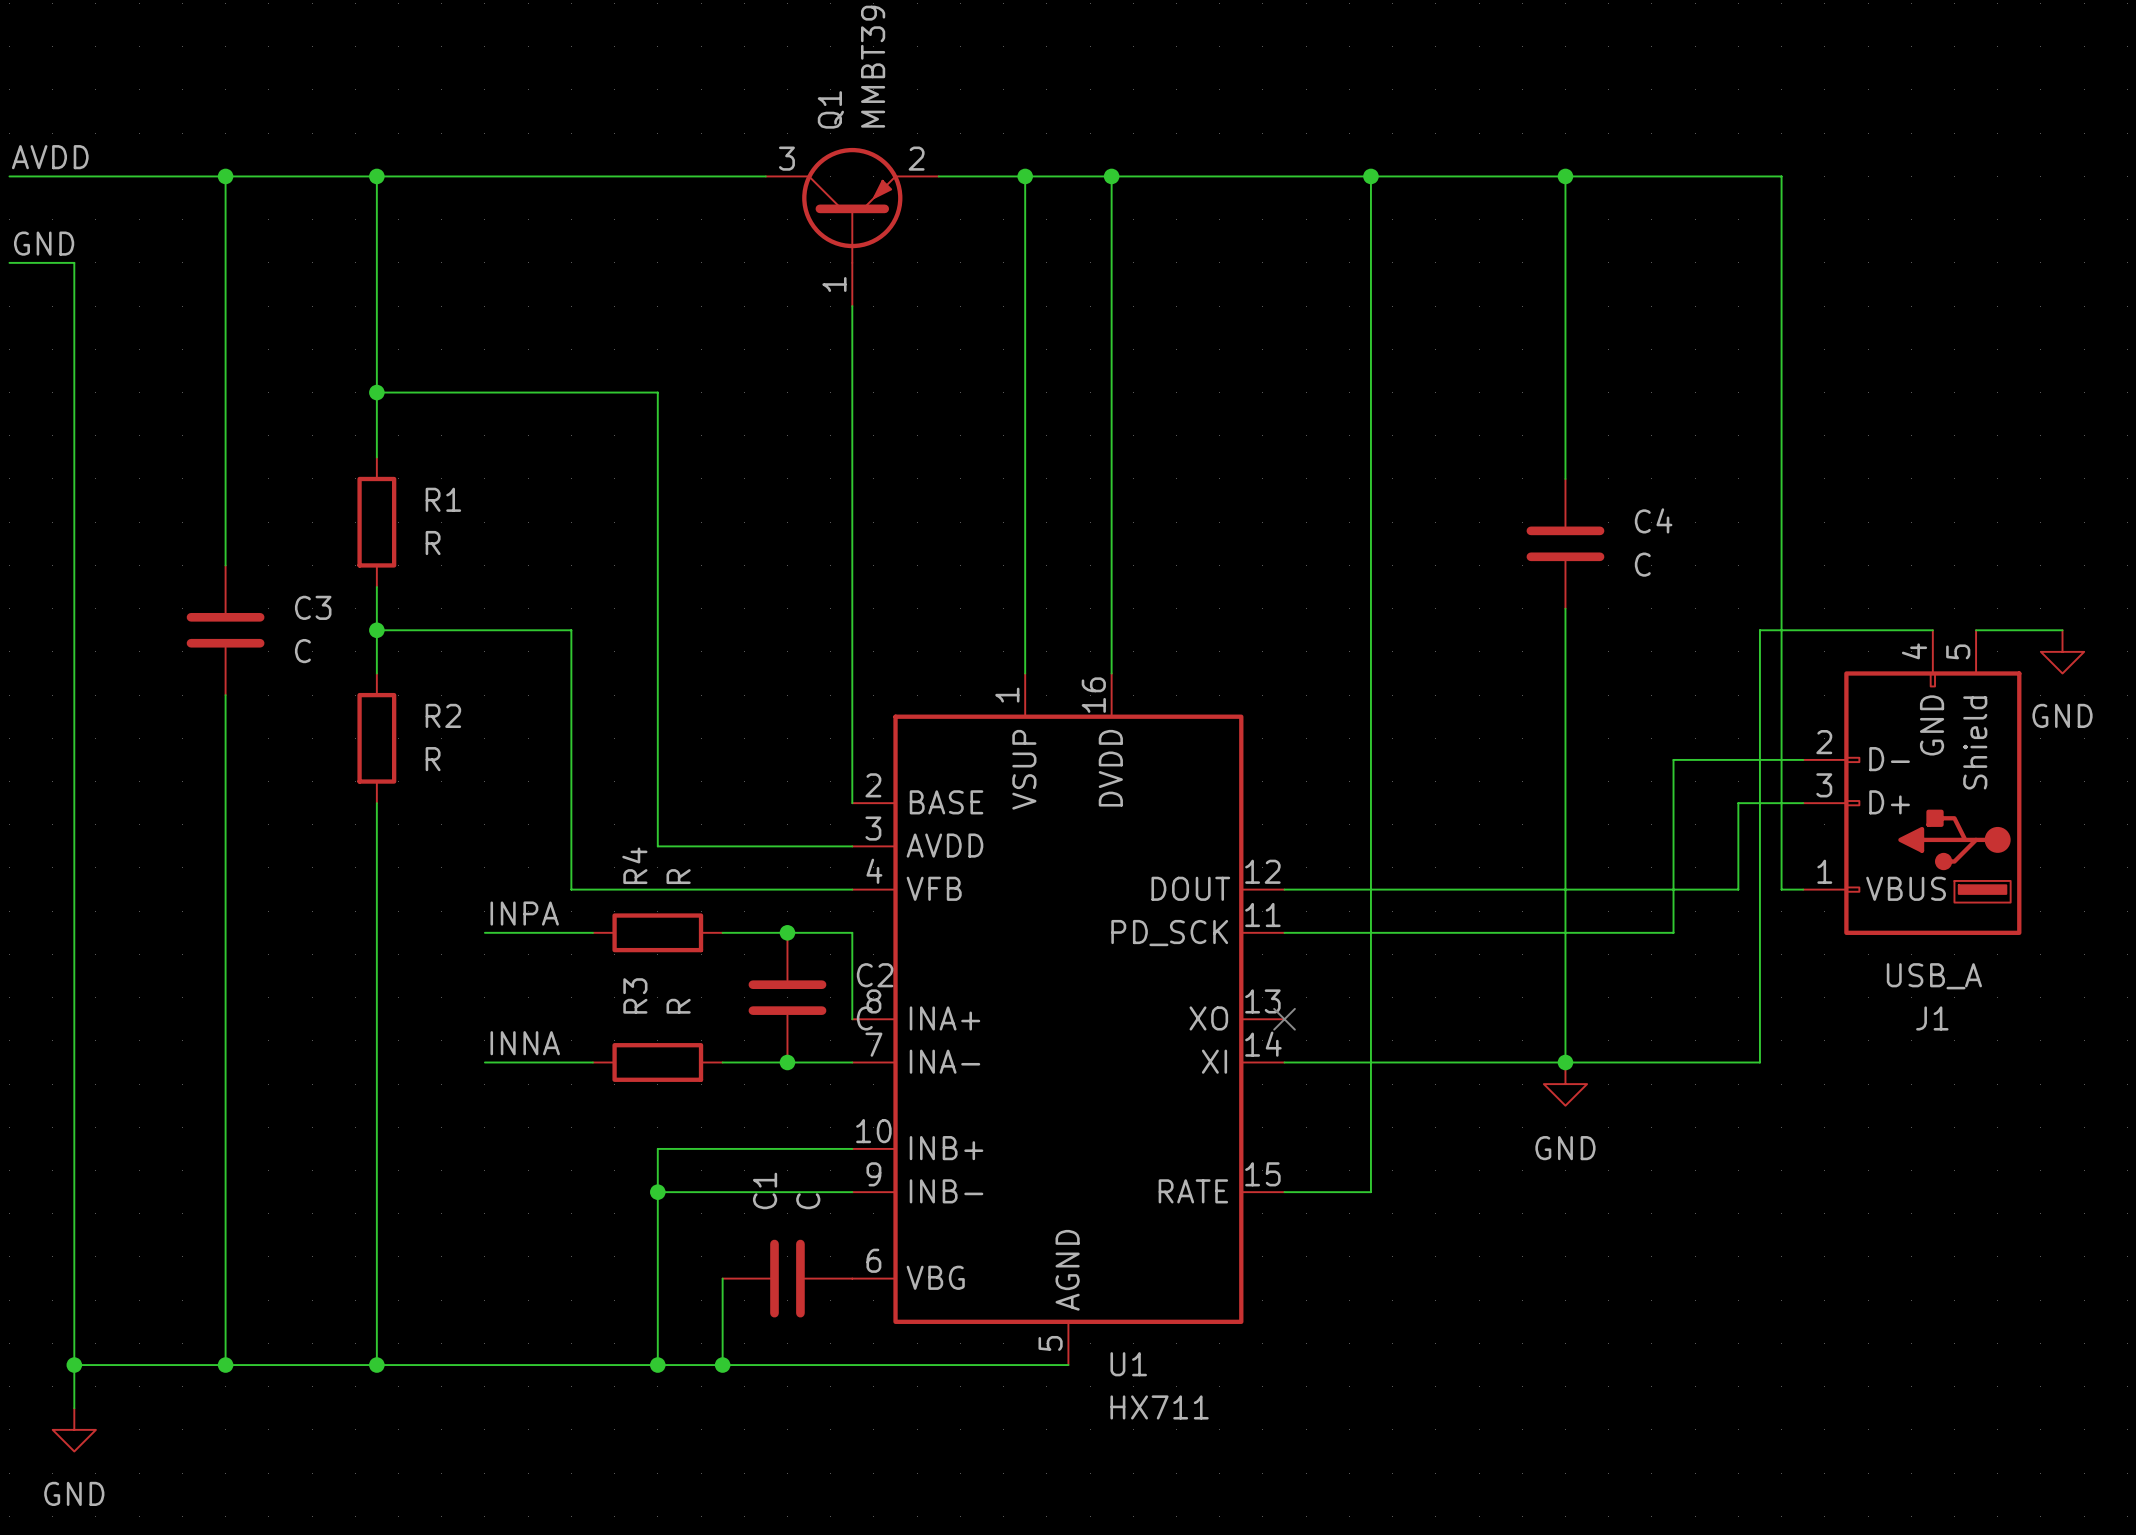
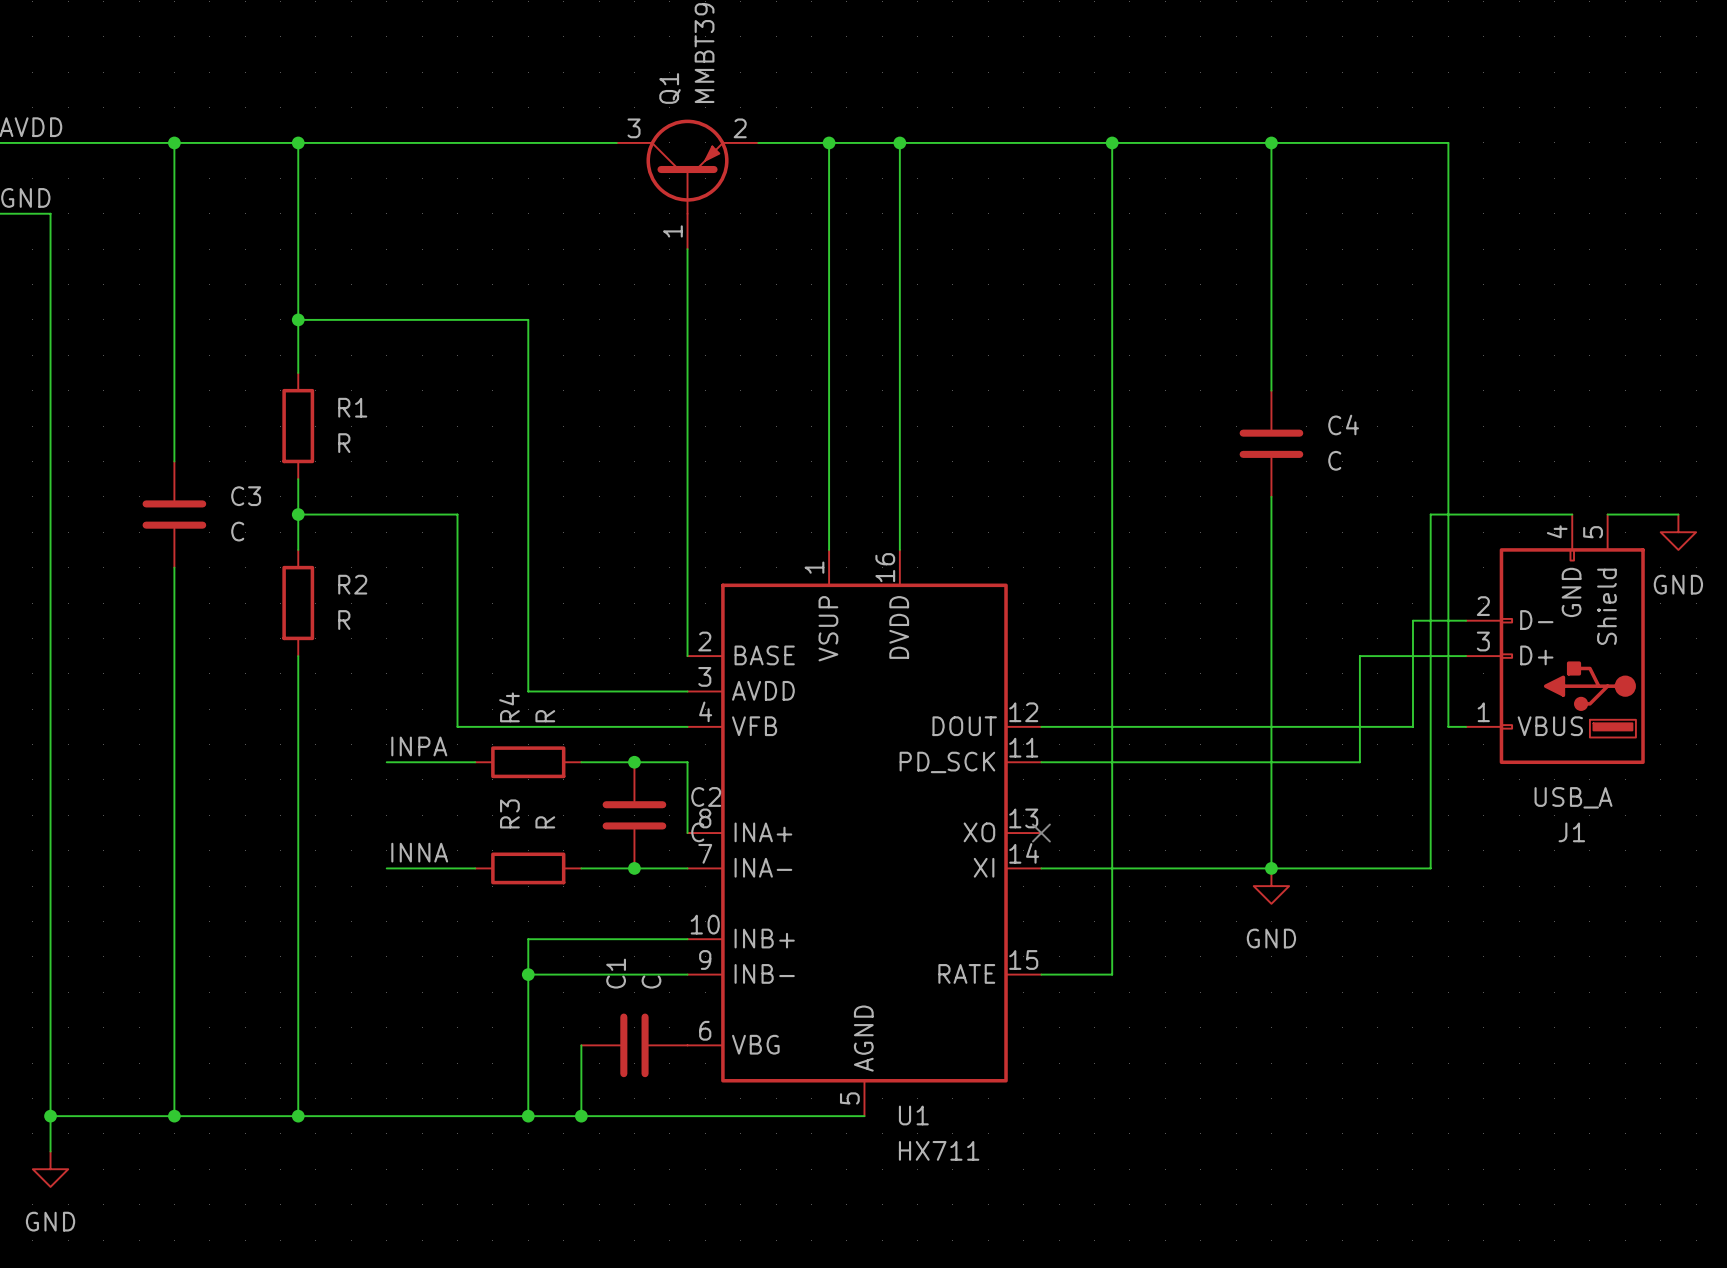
wire: (1738, 759) (1673, 759) (1673, 803) -> (1412, 620) (1412, 656) (1359, 656)

